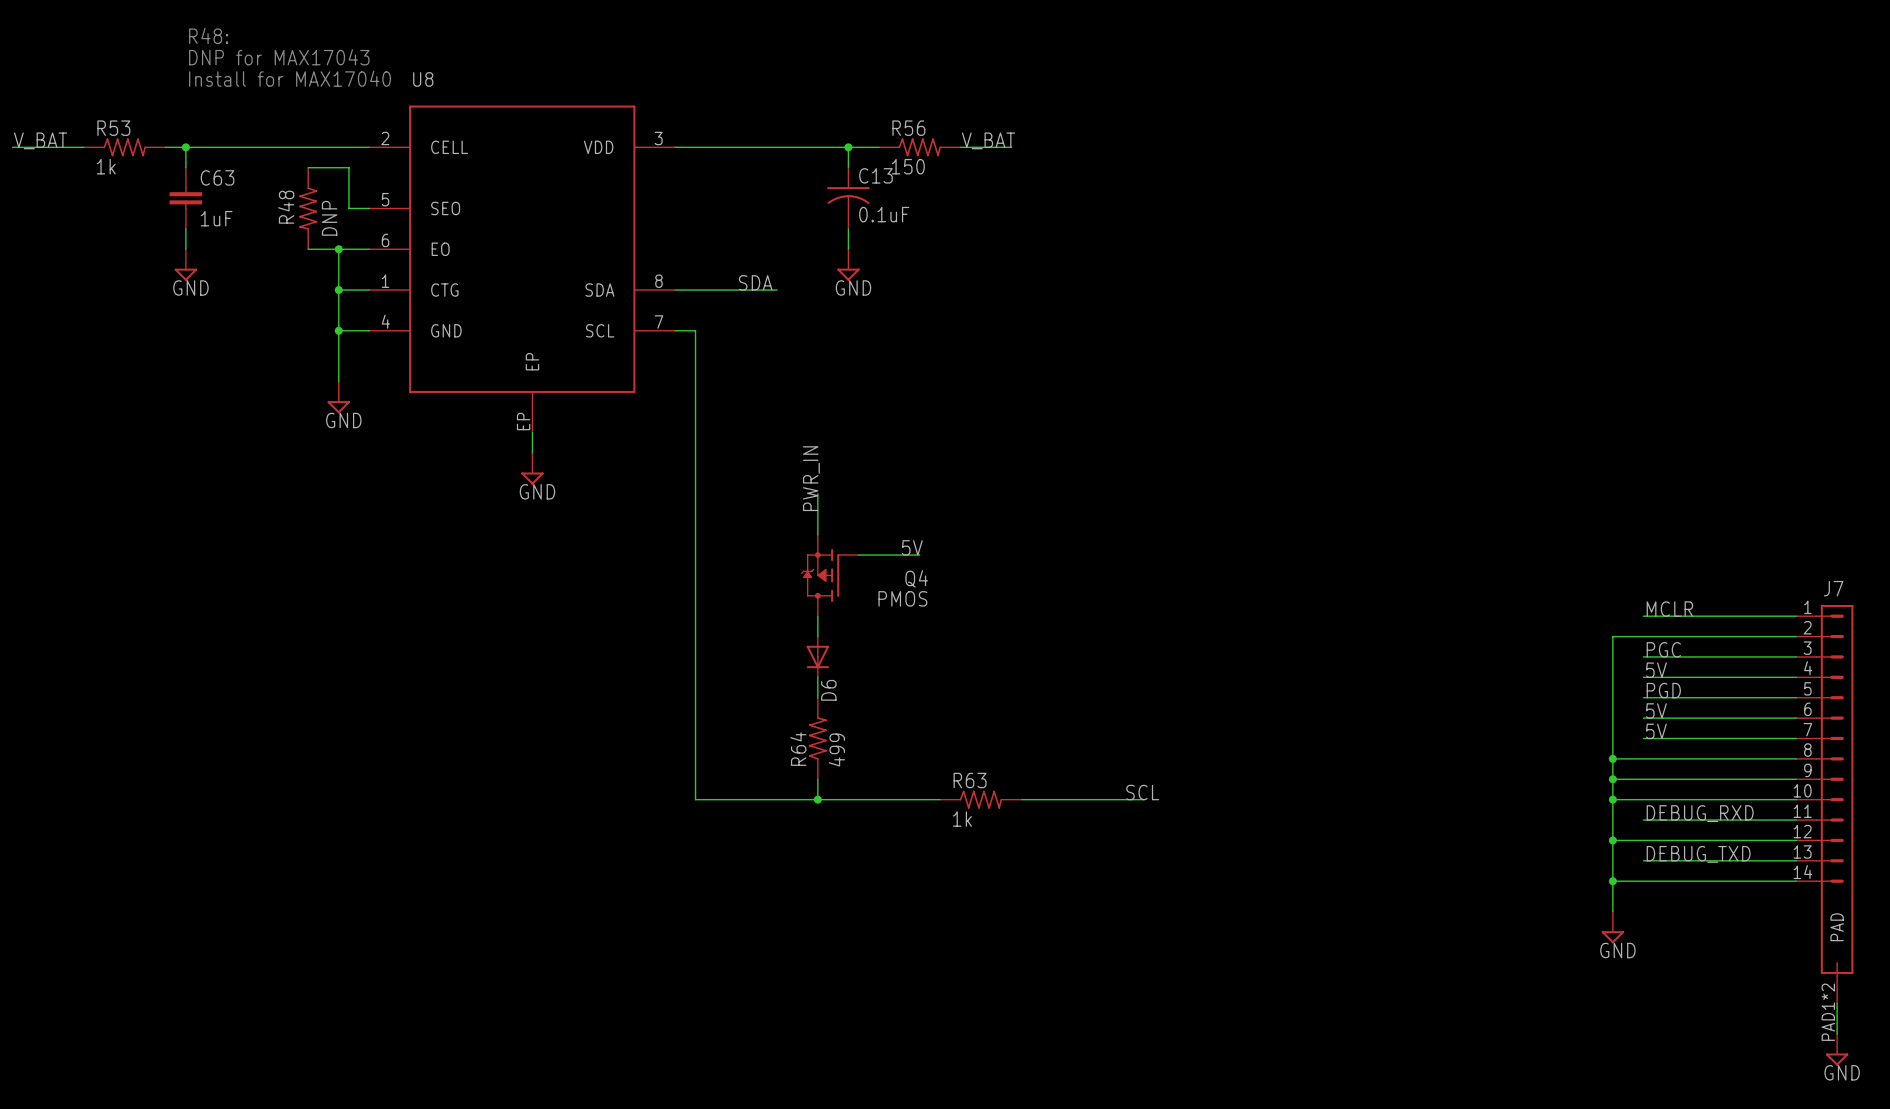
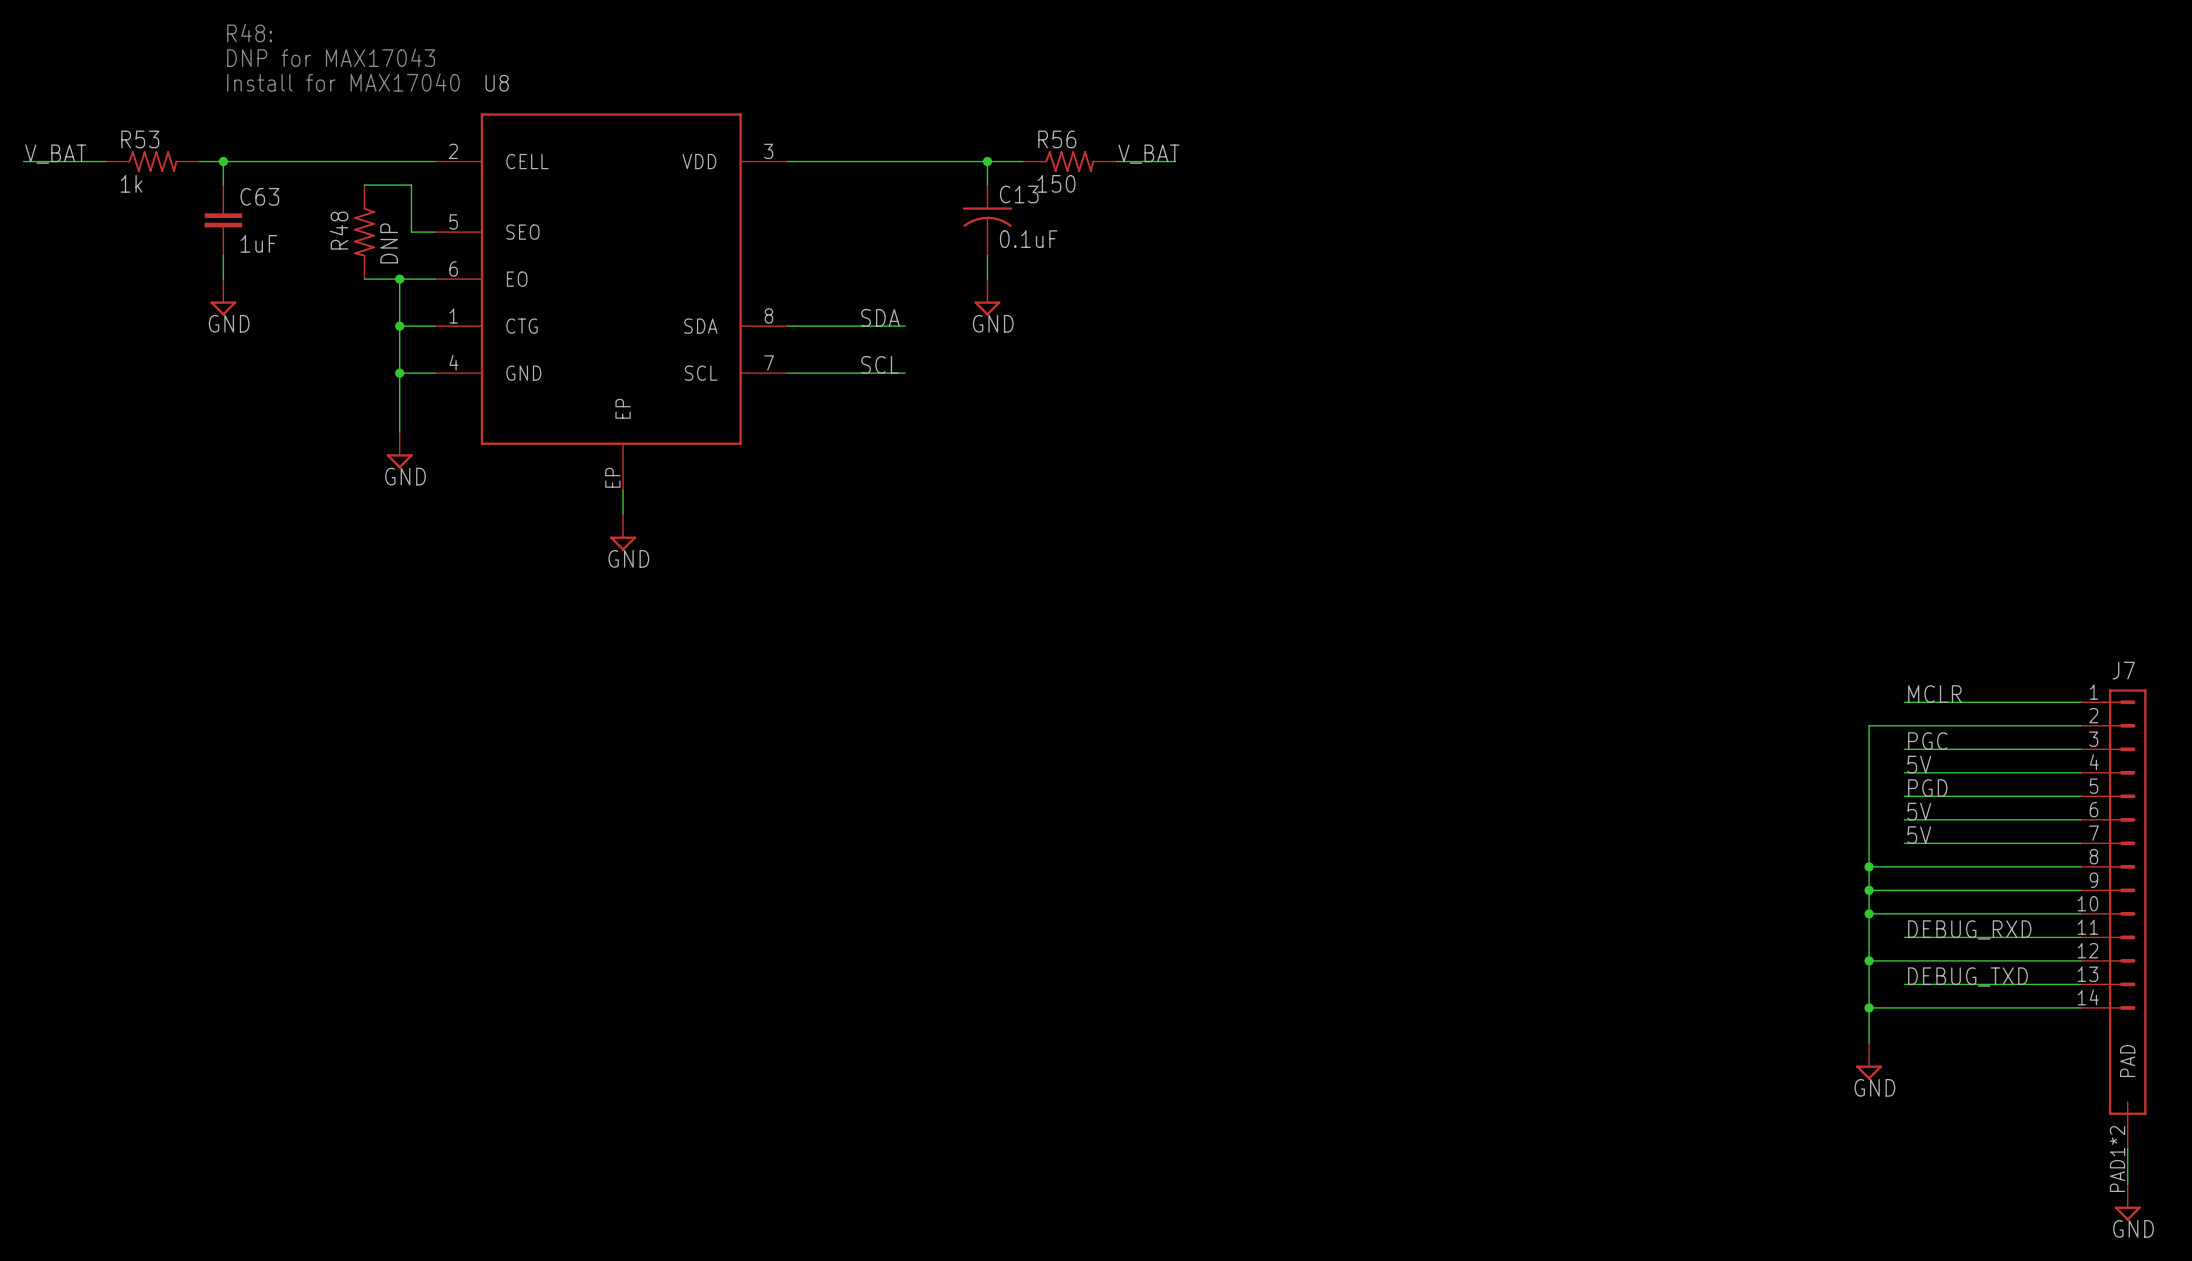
label: none -> SCL (880, 364)
wire: (695, 330) (695, 799) (940, 799) -> (811, 373) (905, 373)
label: PWR_IN (811, 478) -> none
wire: (817, 493) (817, 534) -> none
label: 5V (912, 547) -> none
wire: (858, 555) (919, 555) -> none
Q4: PMOS (829, 575) -> none
wire: (817, 616) (817, 636) -> none
D6: (817, 656) -> none
wire: (817, 677) (817, 697) -> none
R64: 499 (817, 738) -> none
wire: (817, 779) (817, 799) -> none
label: SCL (1142, 792) -> none
junction: (817, 799) -> none
R63: 1k (980, 799) -> none
wire: (1021, 799) (1144, 799) -> none

